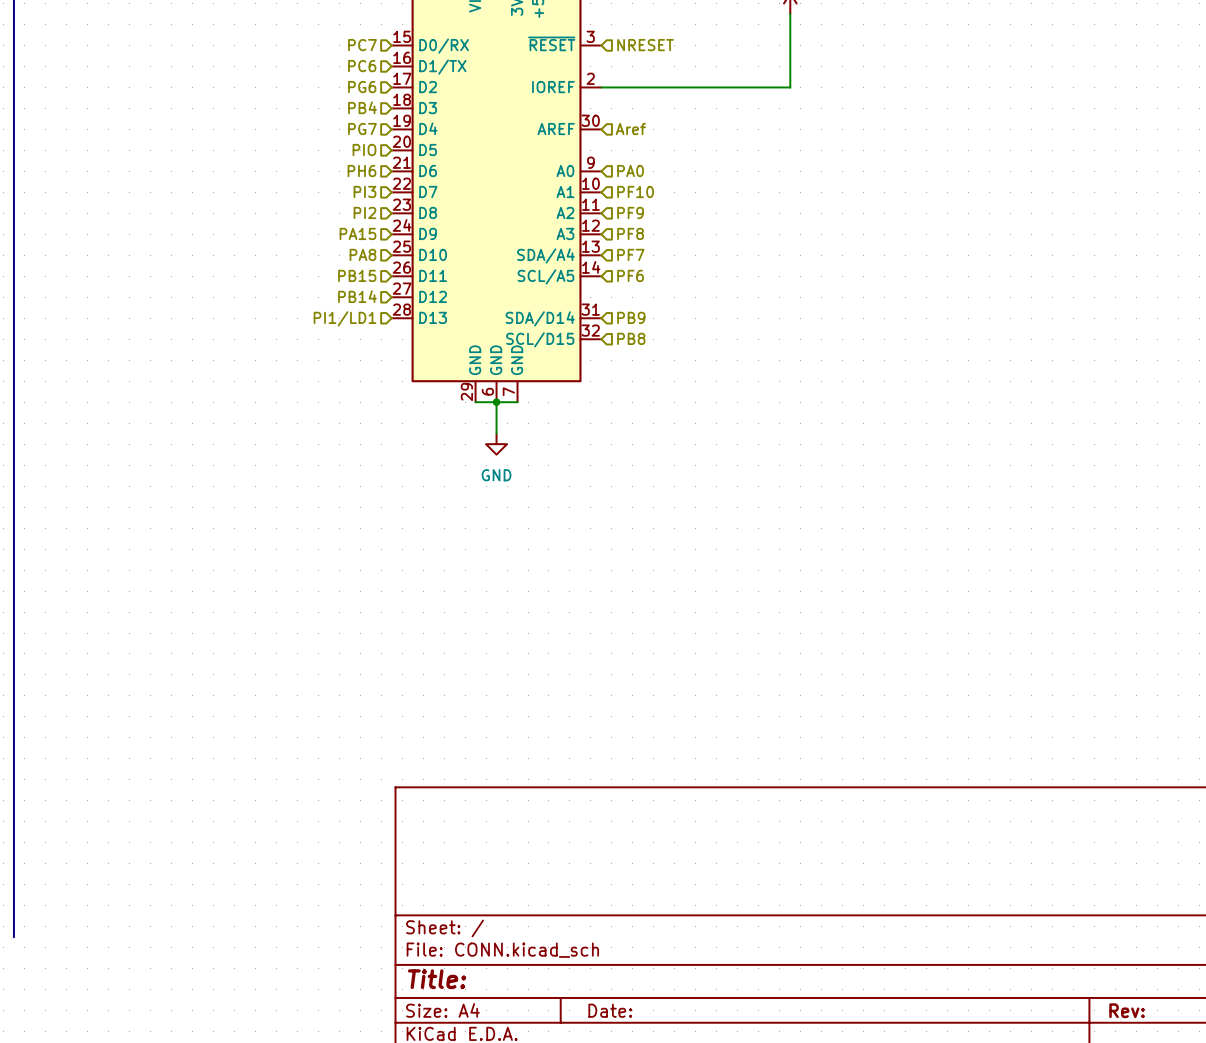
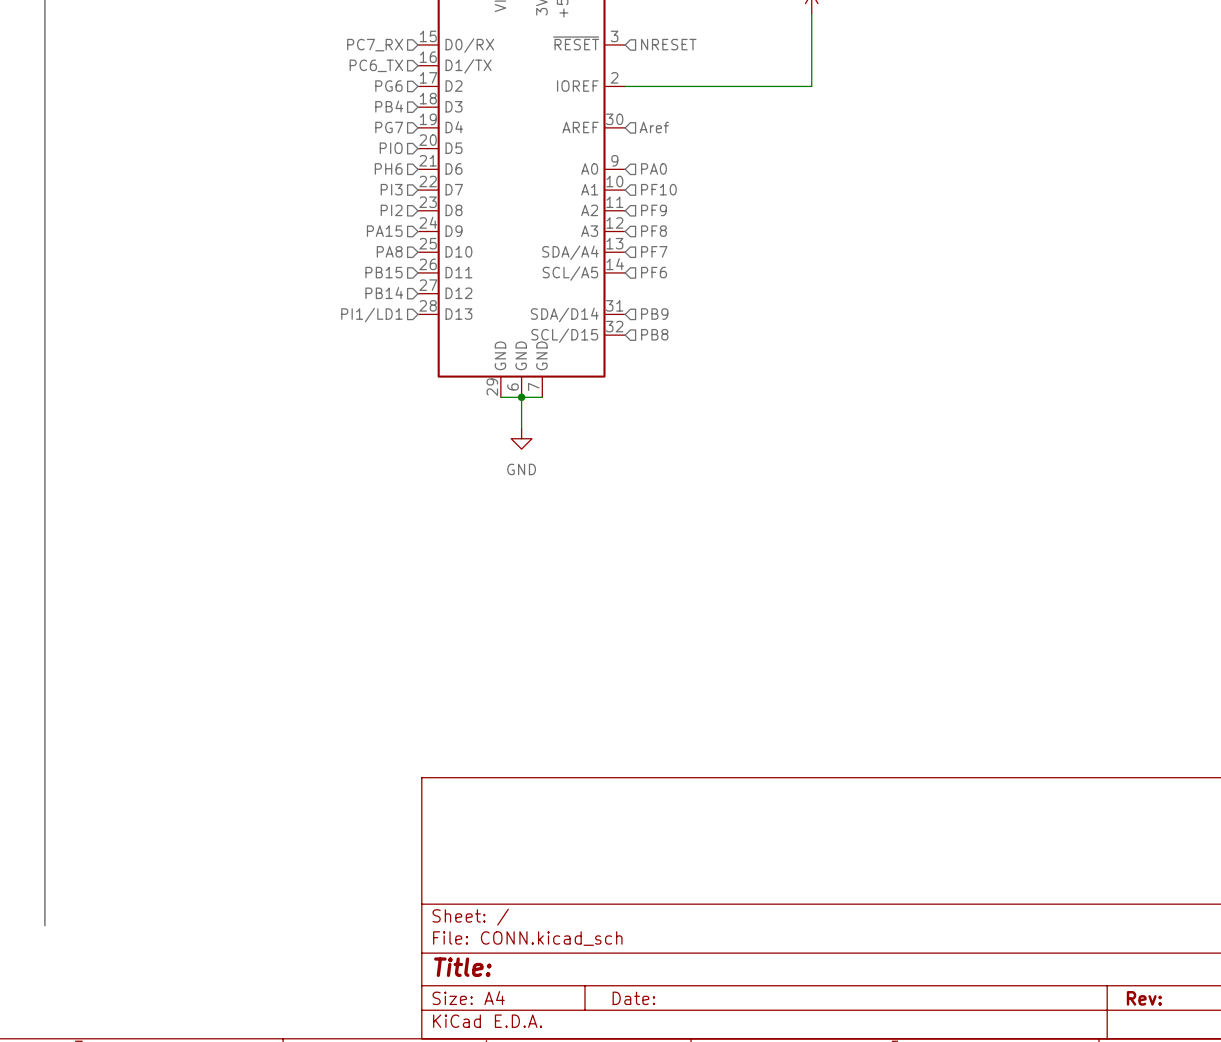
hierarchical label: PC7 (362, 45) -> PC7_RX (375, 45)
hierarchical label: PC6 (362, 66) -> PC6_TX (376, 65)

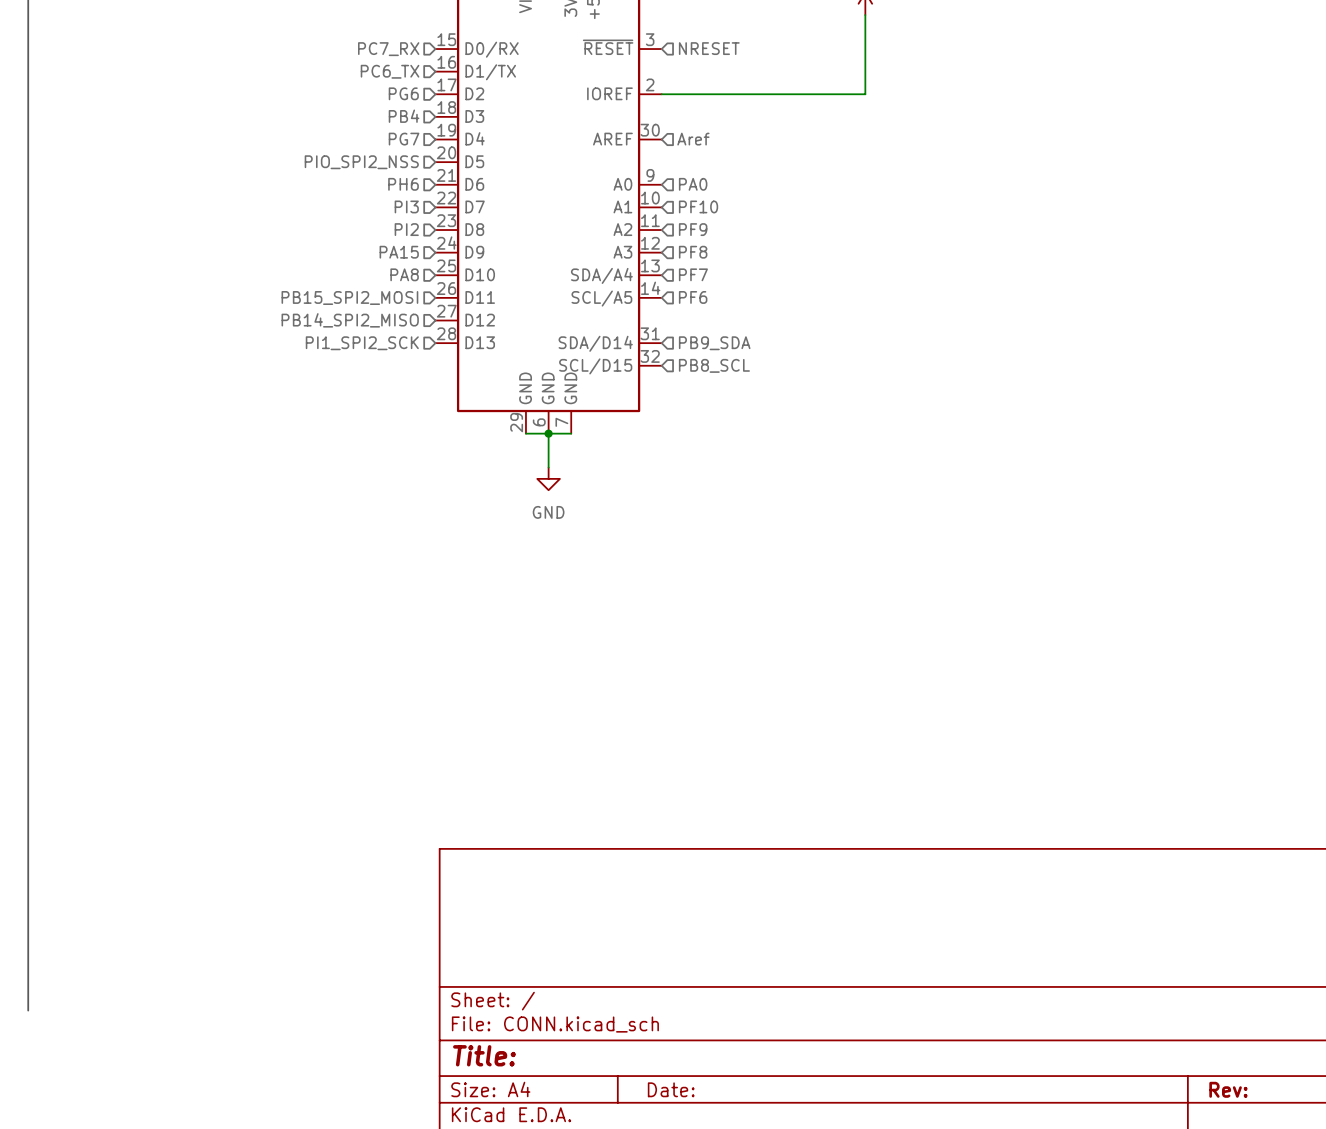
hierarchical label: PIO (391, 148) -> PIO_SPI2_NSS (361, 162)
hierarchical label: PB15 (384, 272) -> PB15_SPI2_MOSI (349, 298)
hierarchical label: PB14 (384, 293) -> PB14_SPI2_MISO (350, 320)
hierarchical label: PB9 (654, 314) -> PB9_SDA (714, 343)
hierarchical label: PI1/LD1 (371, 315) -> PI1_SPI2_SCK (362, 343)
hierarchical label: PB8 (654, 334) -> PB8_SCL (714, 365)

